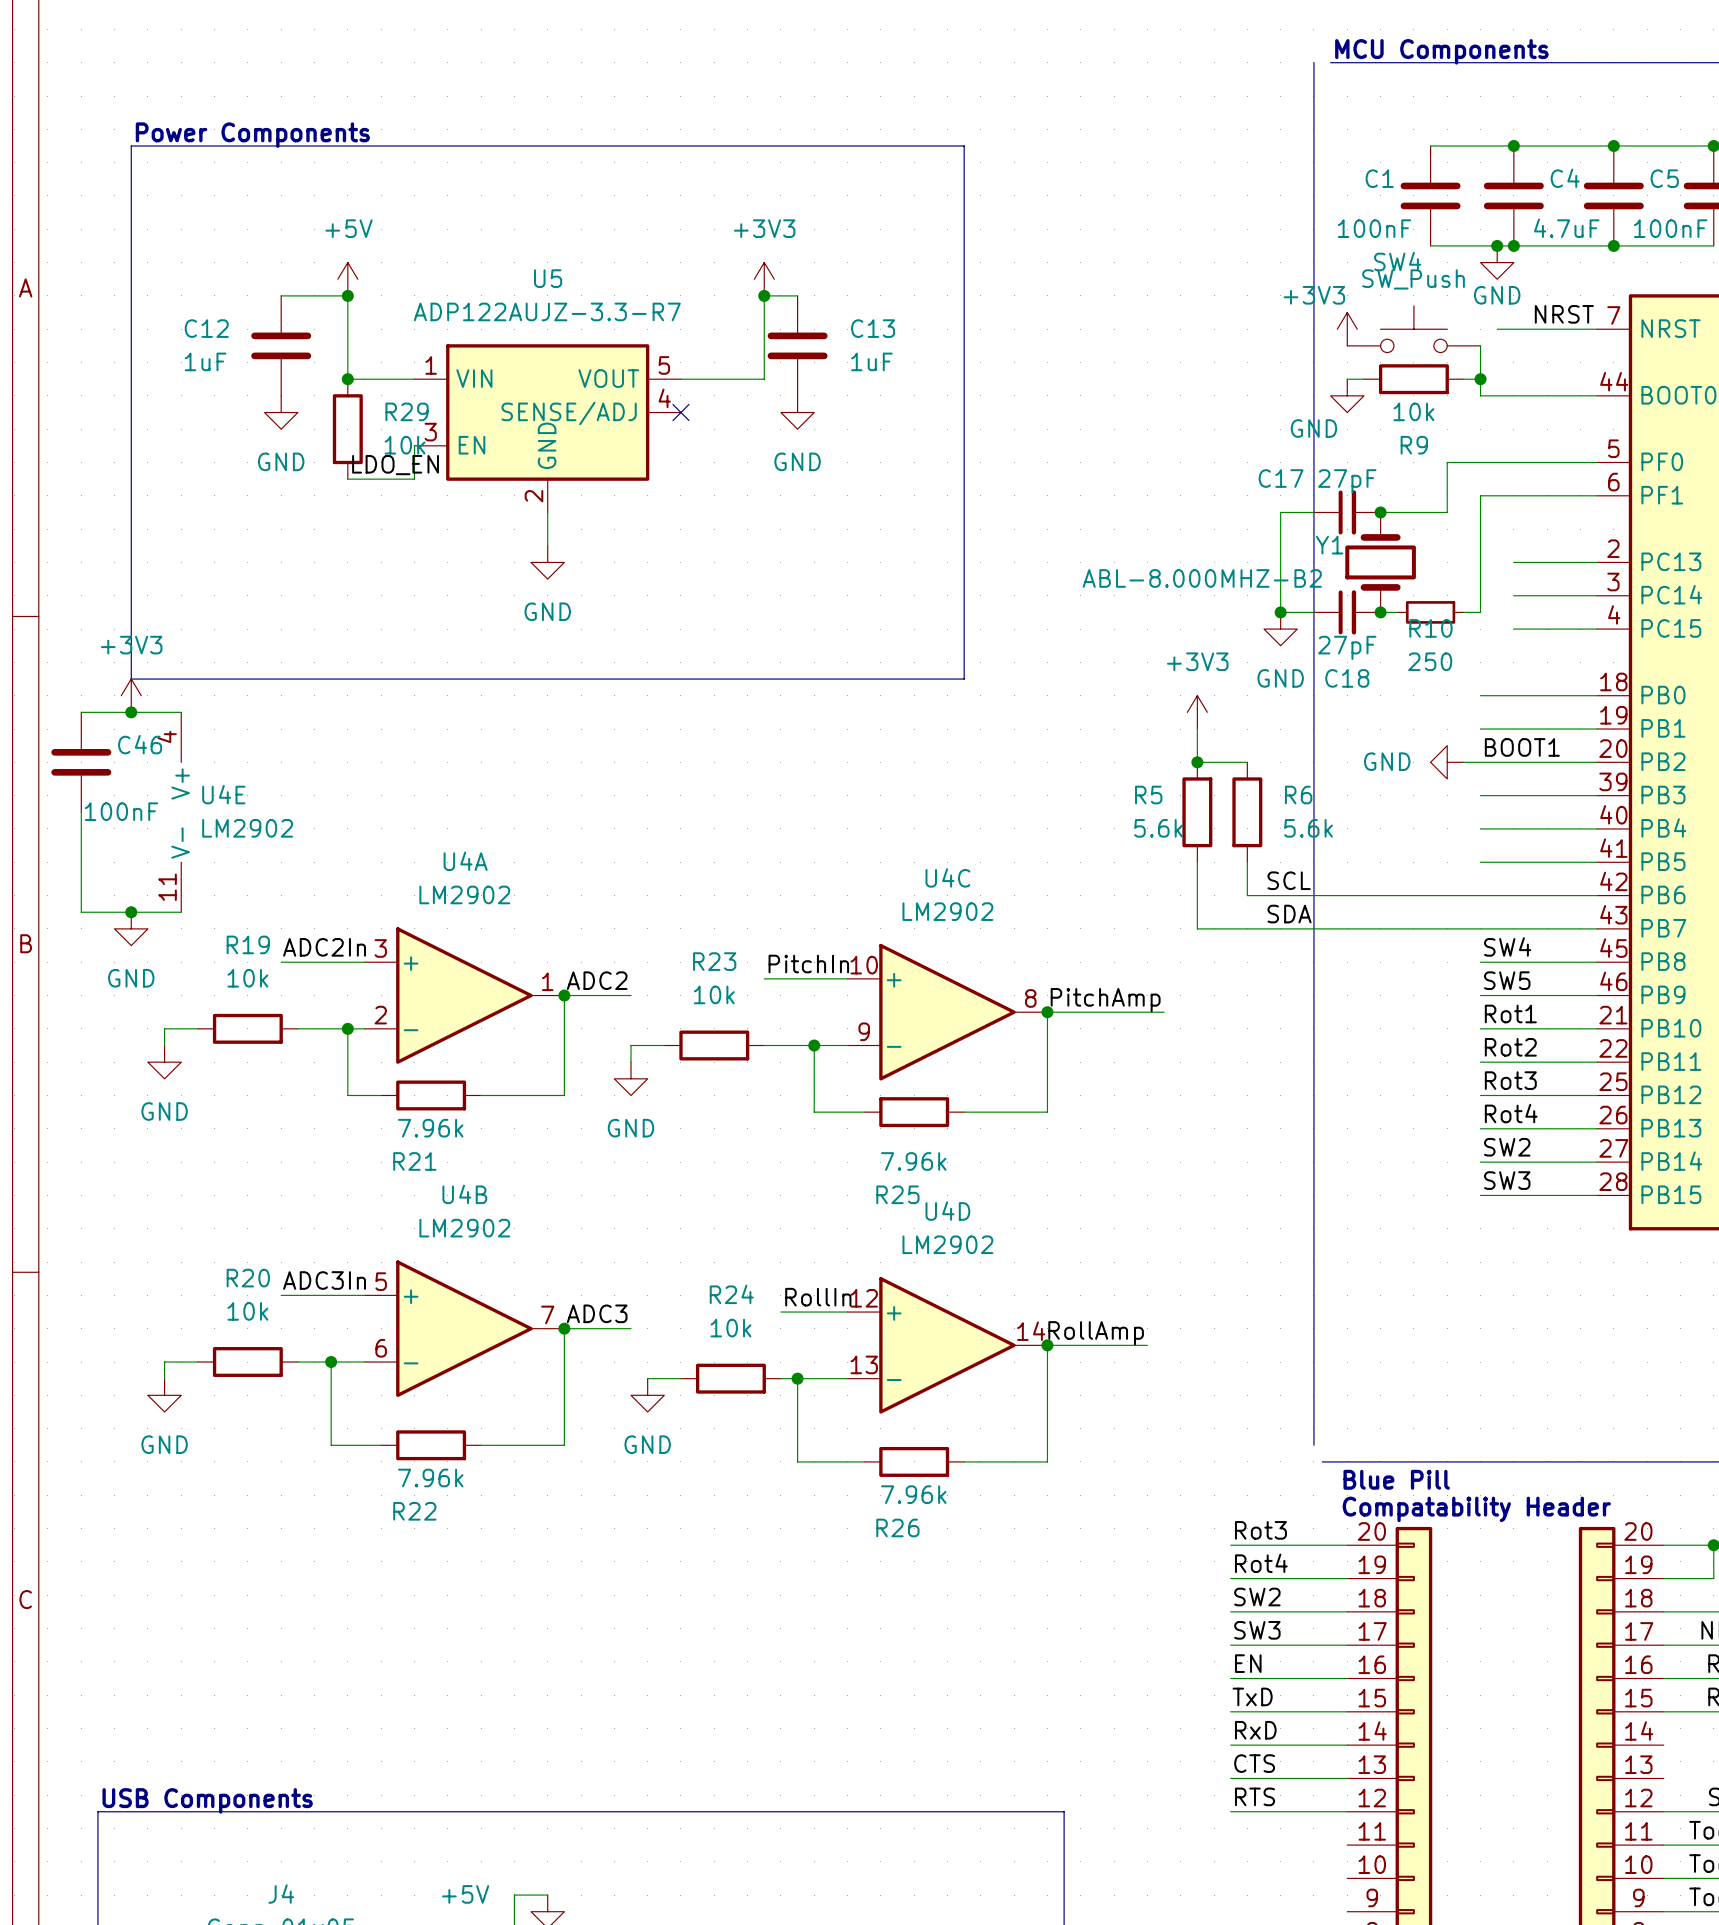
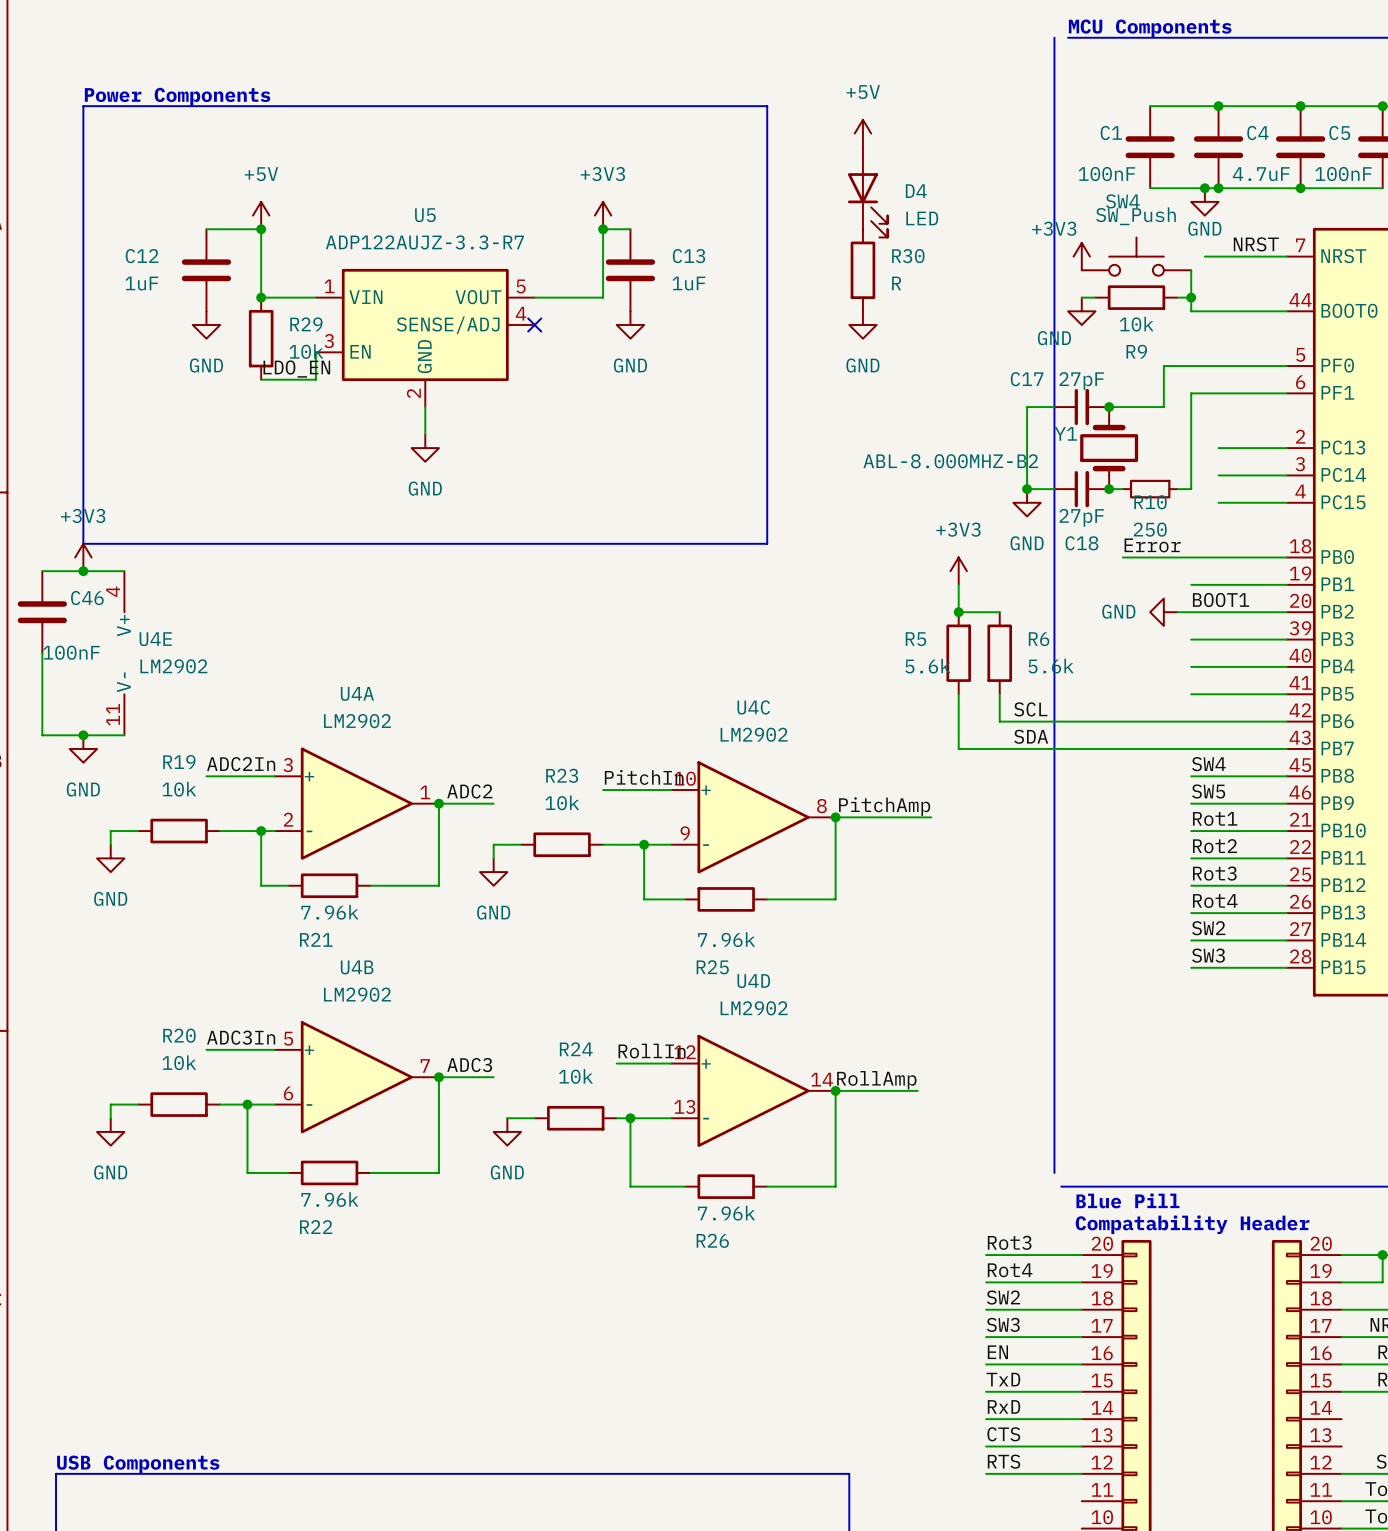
power symbol: none -> +5V (862, 133)
D4: none -> LED (867, 192)
R30: none -> R (862, 270)
power symbol: none -> GND (862, 324)
label: none -> Error (1152, 545)
wire: none -> (1122, 557) (1191, 557)

